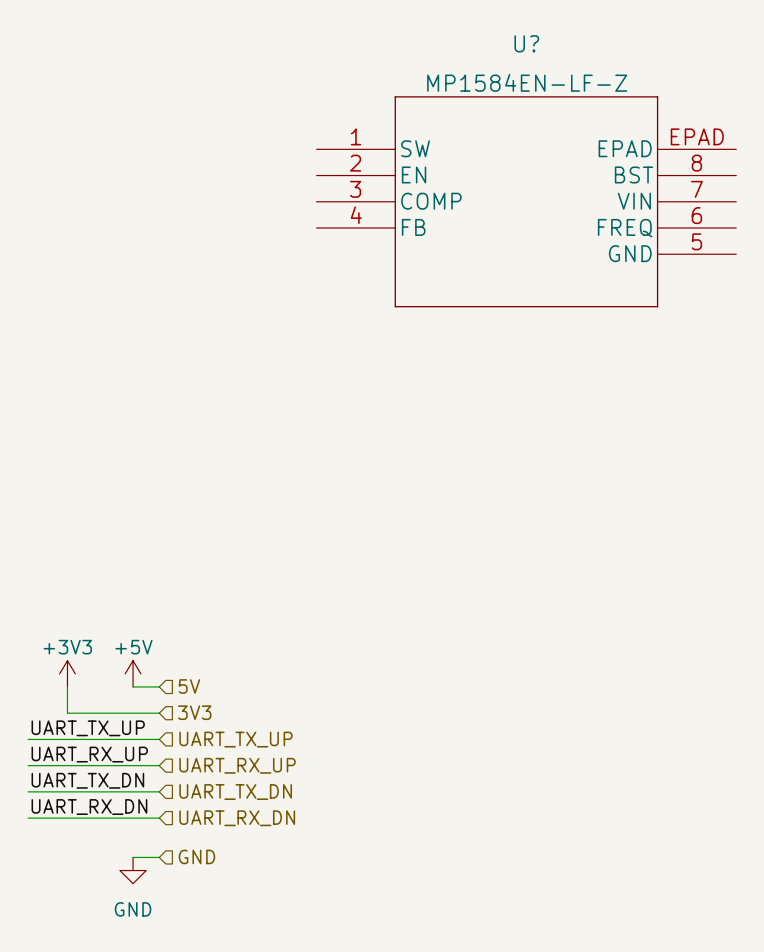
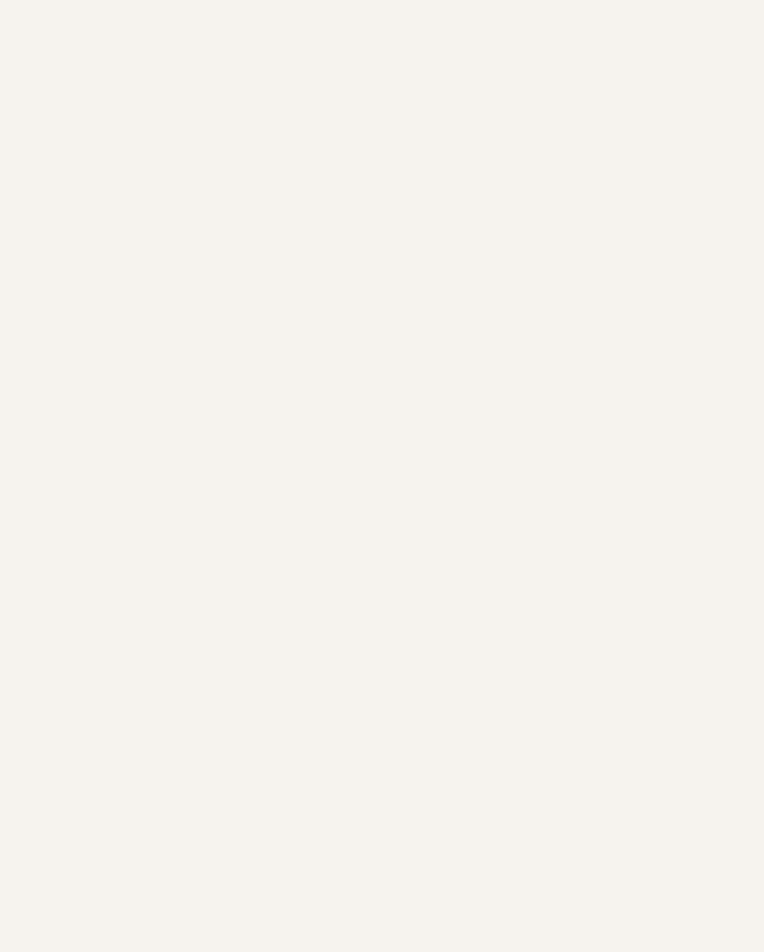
U?: MP1584EN-LF-Z (526, 201) -> none
power symbol: +3V3 (67, 673) -> none
power symbol: +5V (133, 673) -> none
wire: (67, 686) (67, 713) (159, 713) -> none
wire: (133, 686) (159, 686) -> none
hierarchical label: 5V (189, 686) -> none
hierarchical label: 3V3 (194, 712) -> none
label: UART_TX_UP (88, 728) -> none
wire: (28, 739) (159, 739) -> none
hierarchical label: UART_TX_UP (235, 739) -> none
label: UART_RX_UP (89, 754) -> none
wire: (28, 765) (159, 765) -> none
hierarchical label: UART_RX_UP (237, 765) -> none
label: UART_TX_DN (87, 780) -> none
wire: (28, 791) (159, 791) -> none
hierarchical label: UART_TX_DN (235, 792) -> none
label: UART_RX_DN (89, 807) -> none
wire: (28, 818) (159, 818) -> none
hierarchical label: UART_RX_DN (237, 818) -> none
hierarchical label: GND (196, 856) -> none
wire: (133, 857) (159, 857) -> none
power symbol: GND (133, 870) -> none

